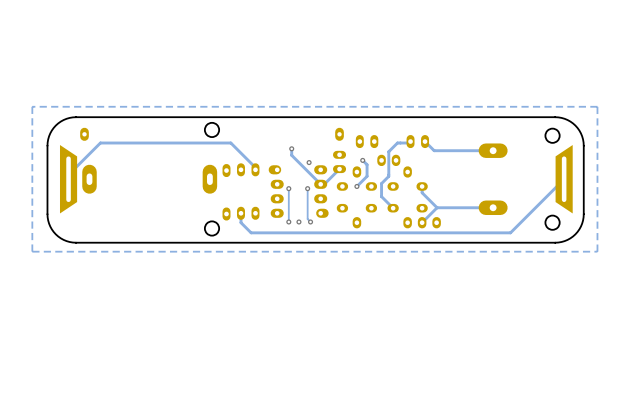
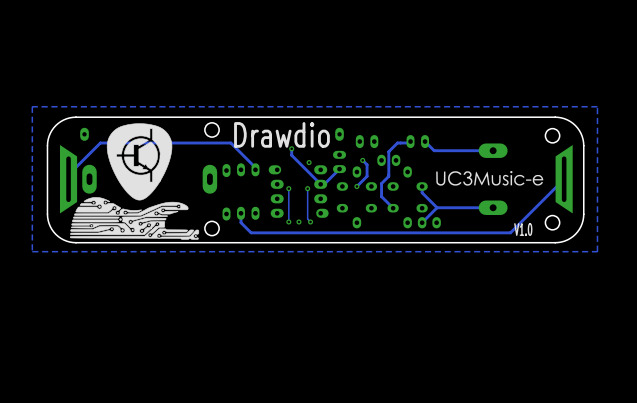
drawing: none -> [69, 123, 200, 240]
text: none -> Drawdio (281, 134)
drawing: none -> [436, 170, 544, 186]
text: none -> V1.0 (523, 229)

